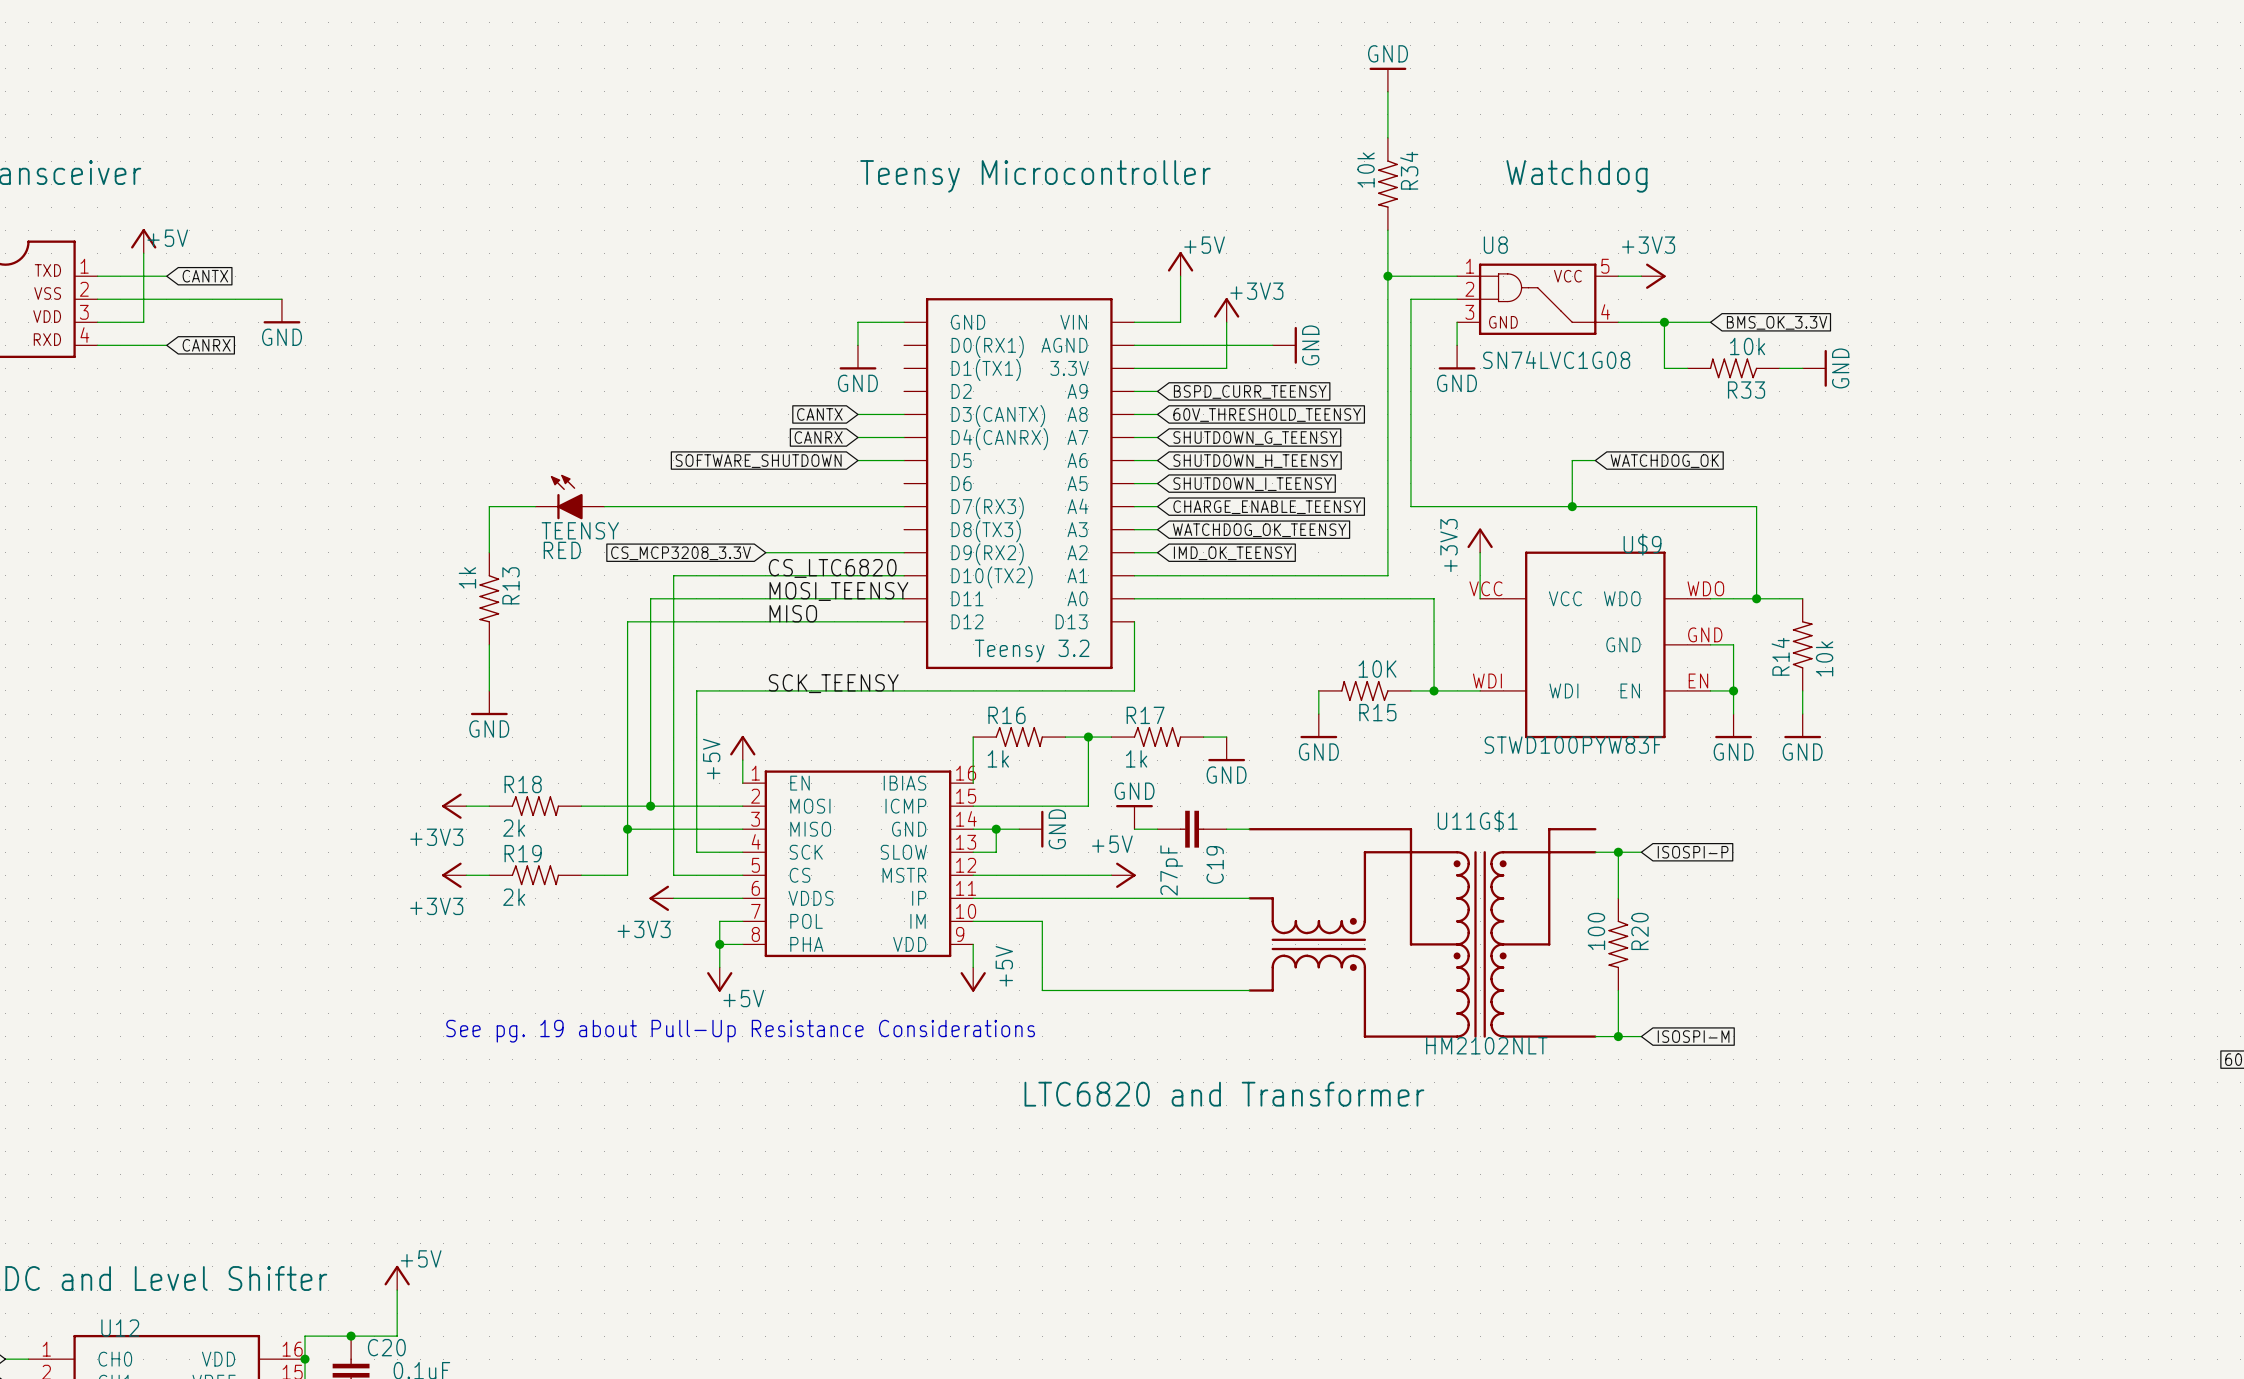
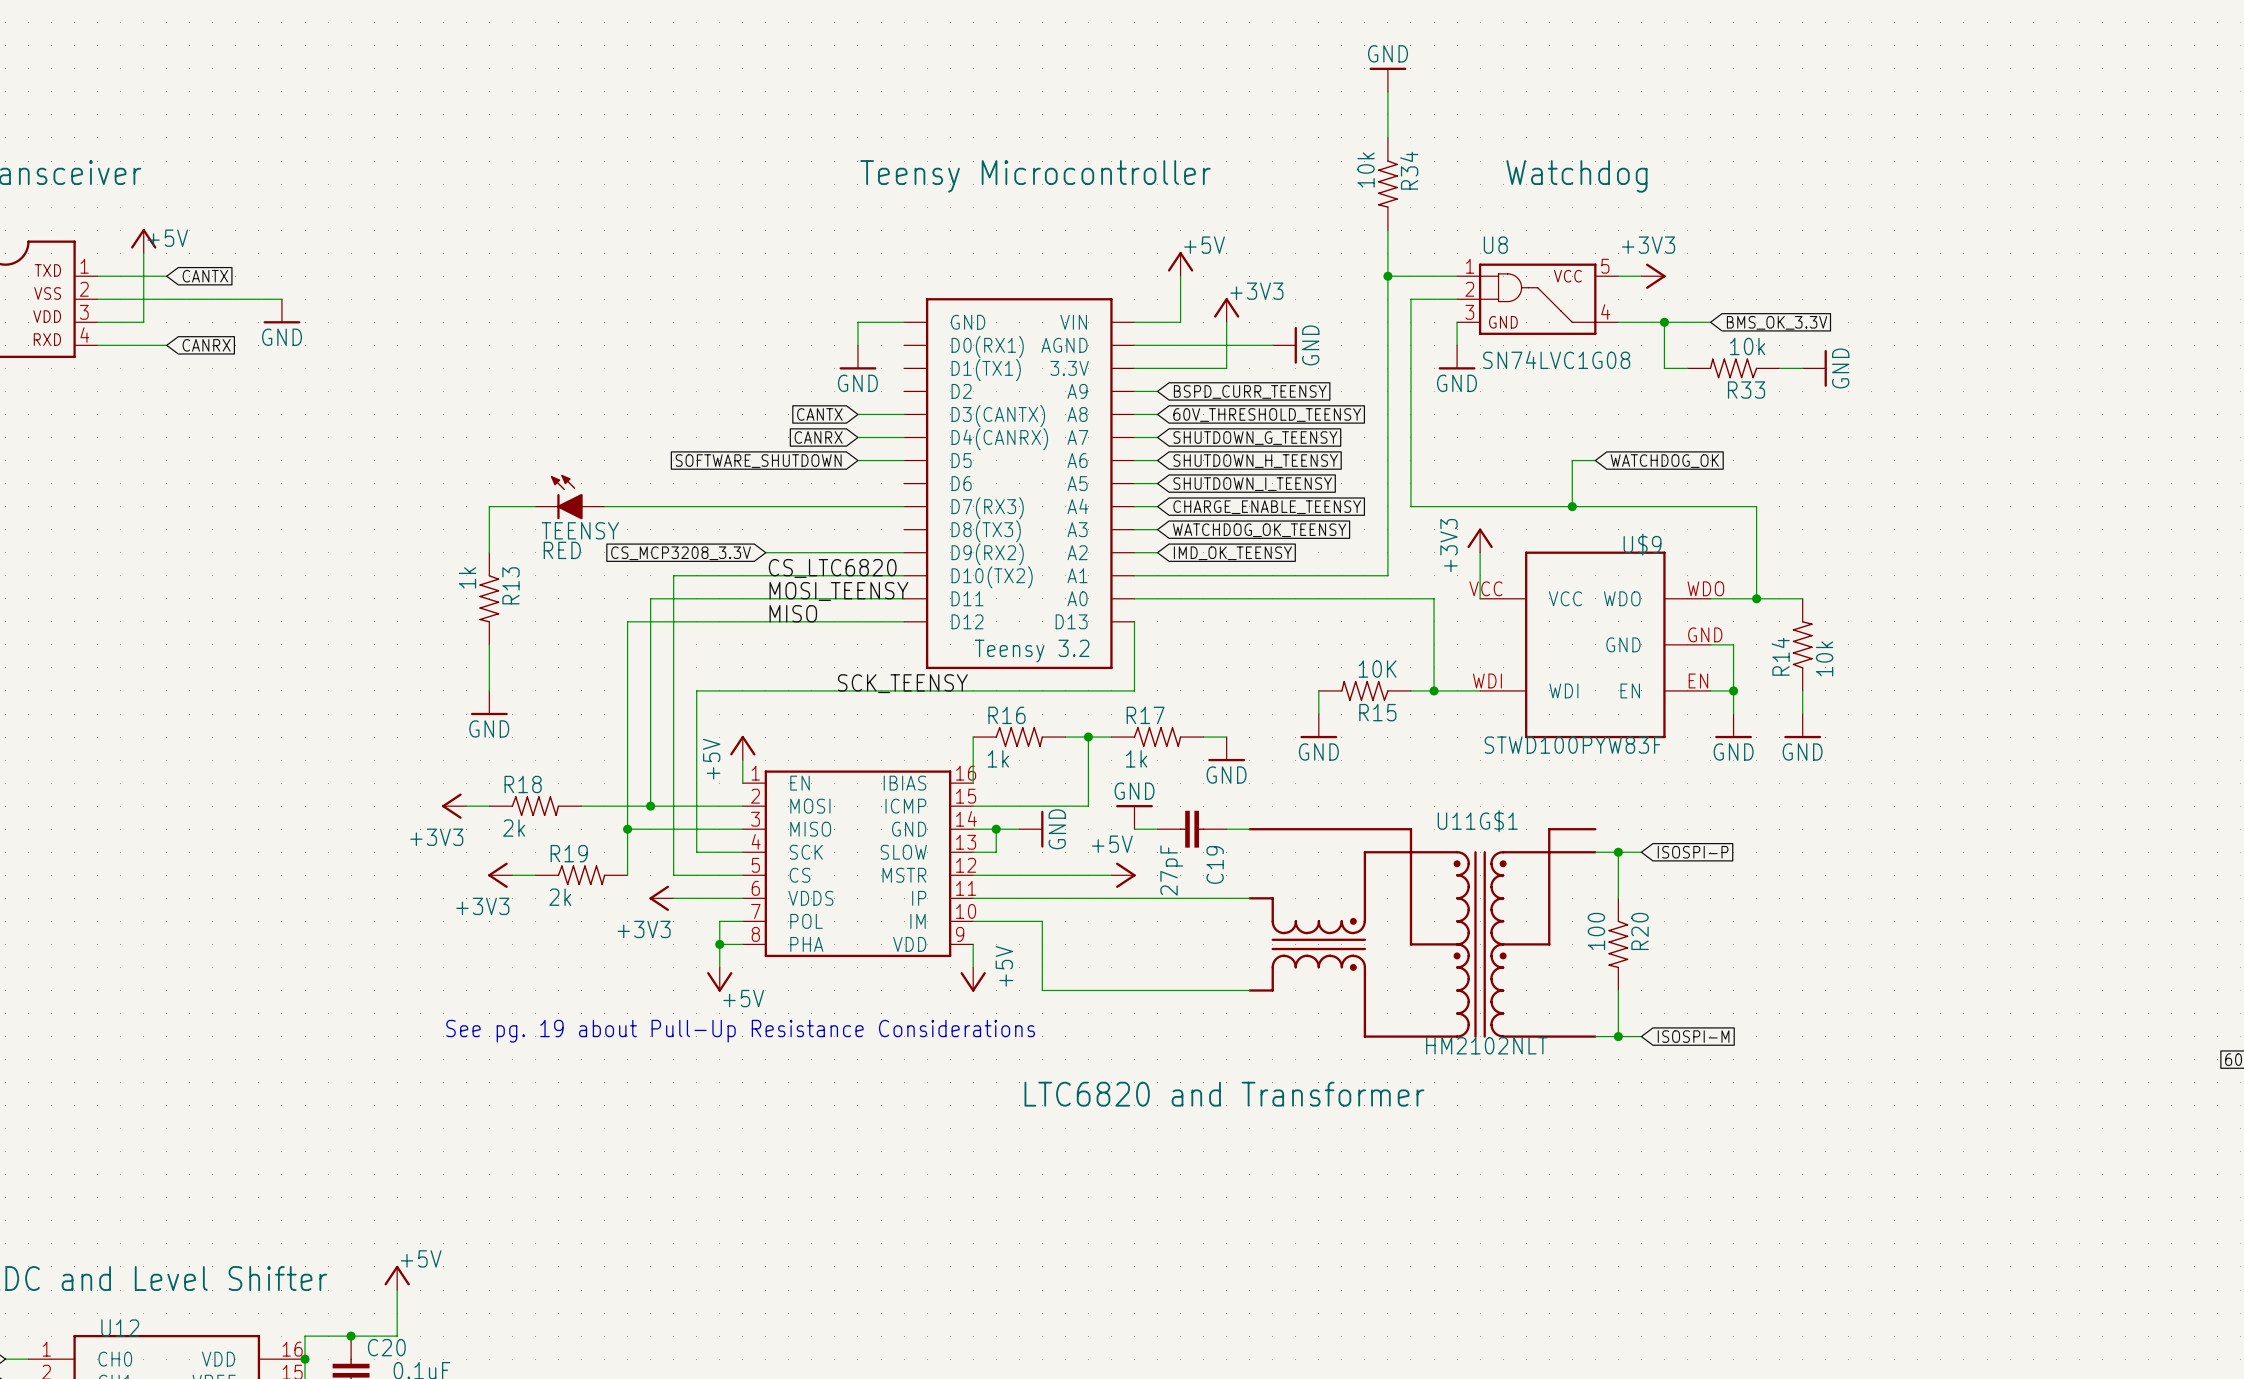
label position: SCK_TEENSY (833, 683) -> SCK_TEENSY (902, 683)
power symbol position: +3V3 (454, 875) -> +3V3 (500, 875)
wire: (466, 875) (489, 875) -> (512, 875) (535, 875)
R19 position: (535, 875) -> (581, 875)

